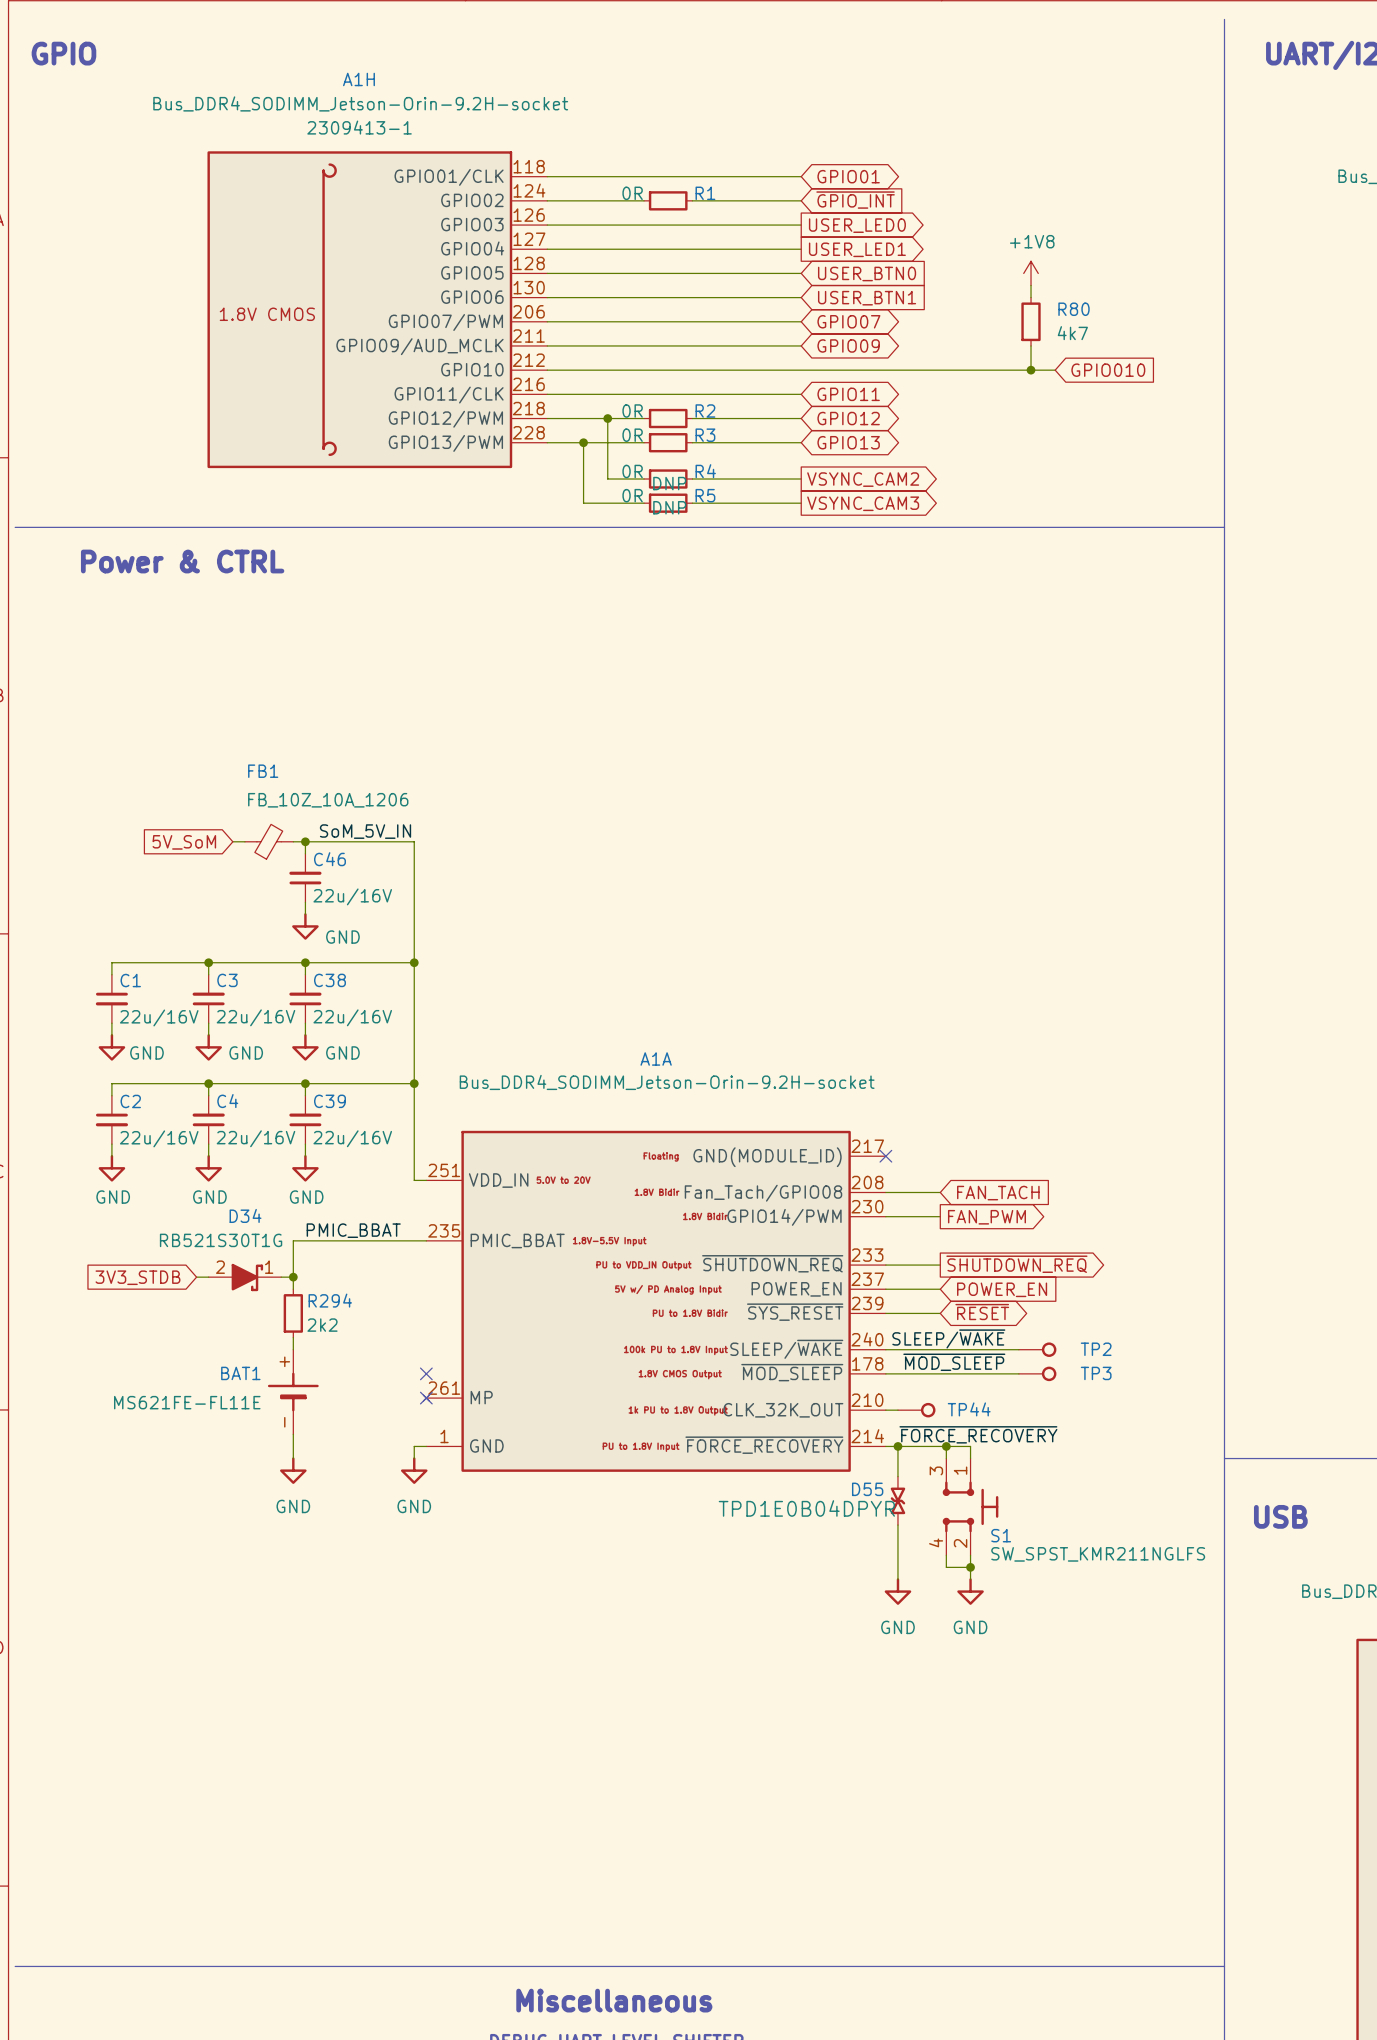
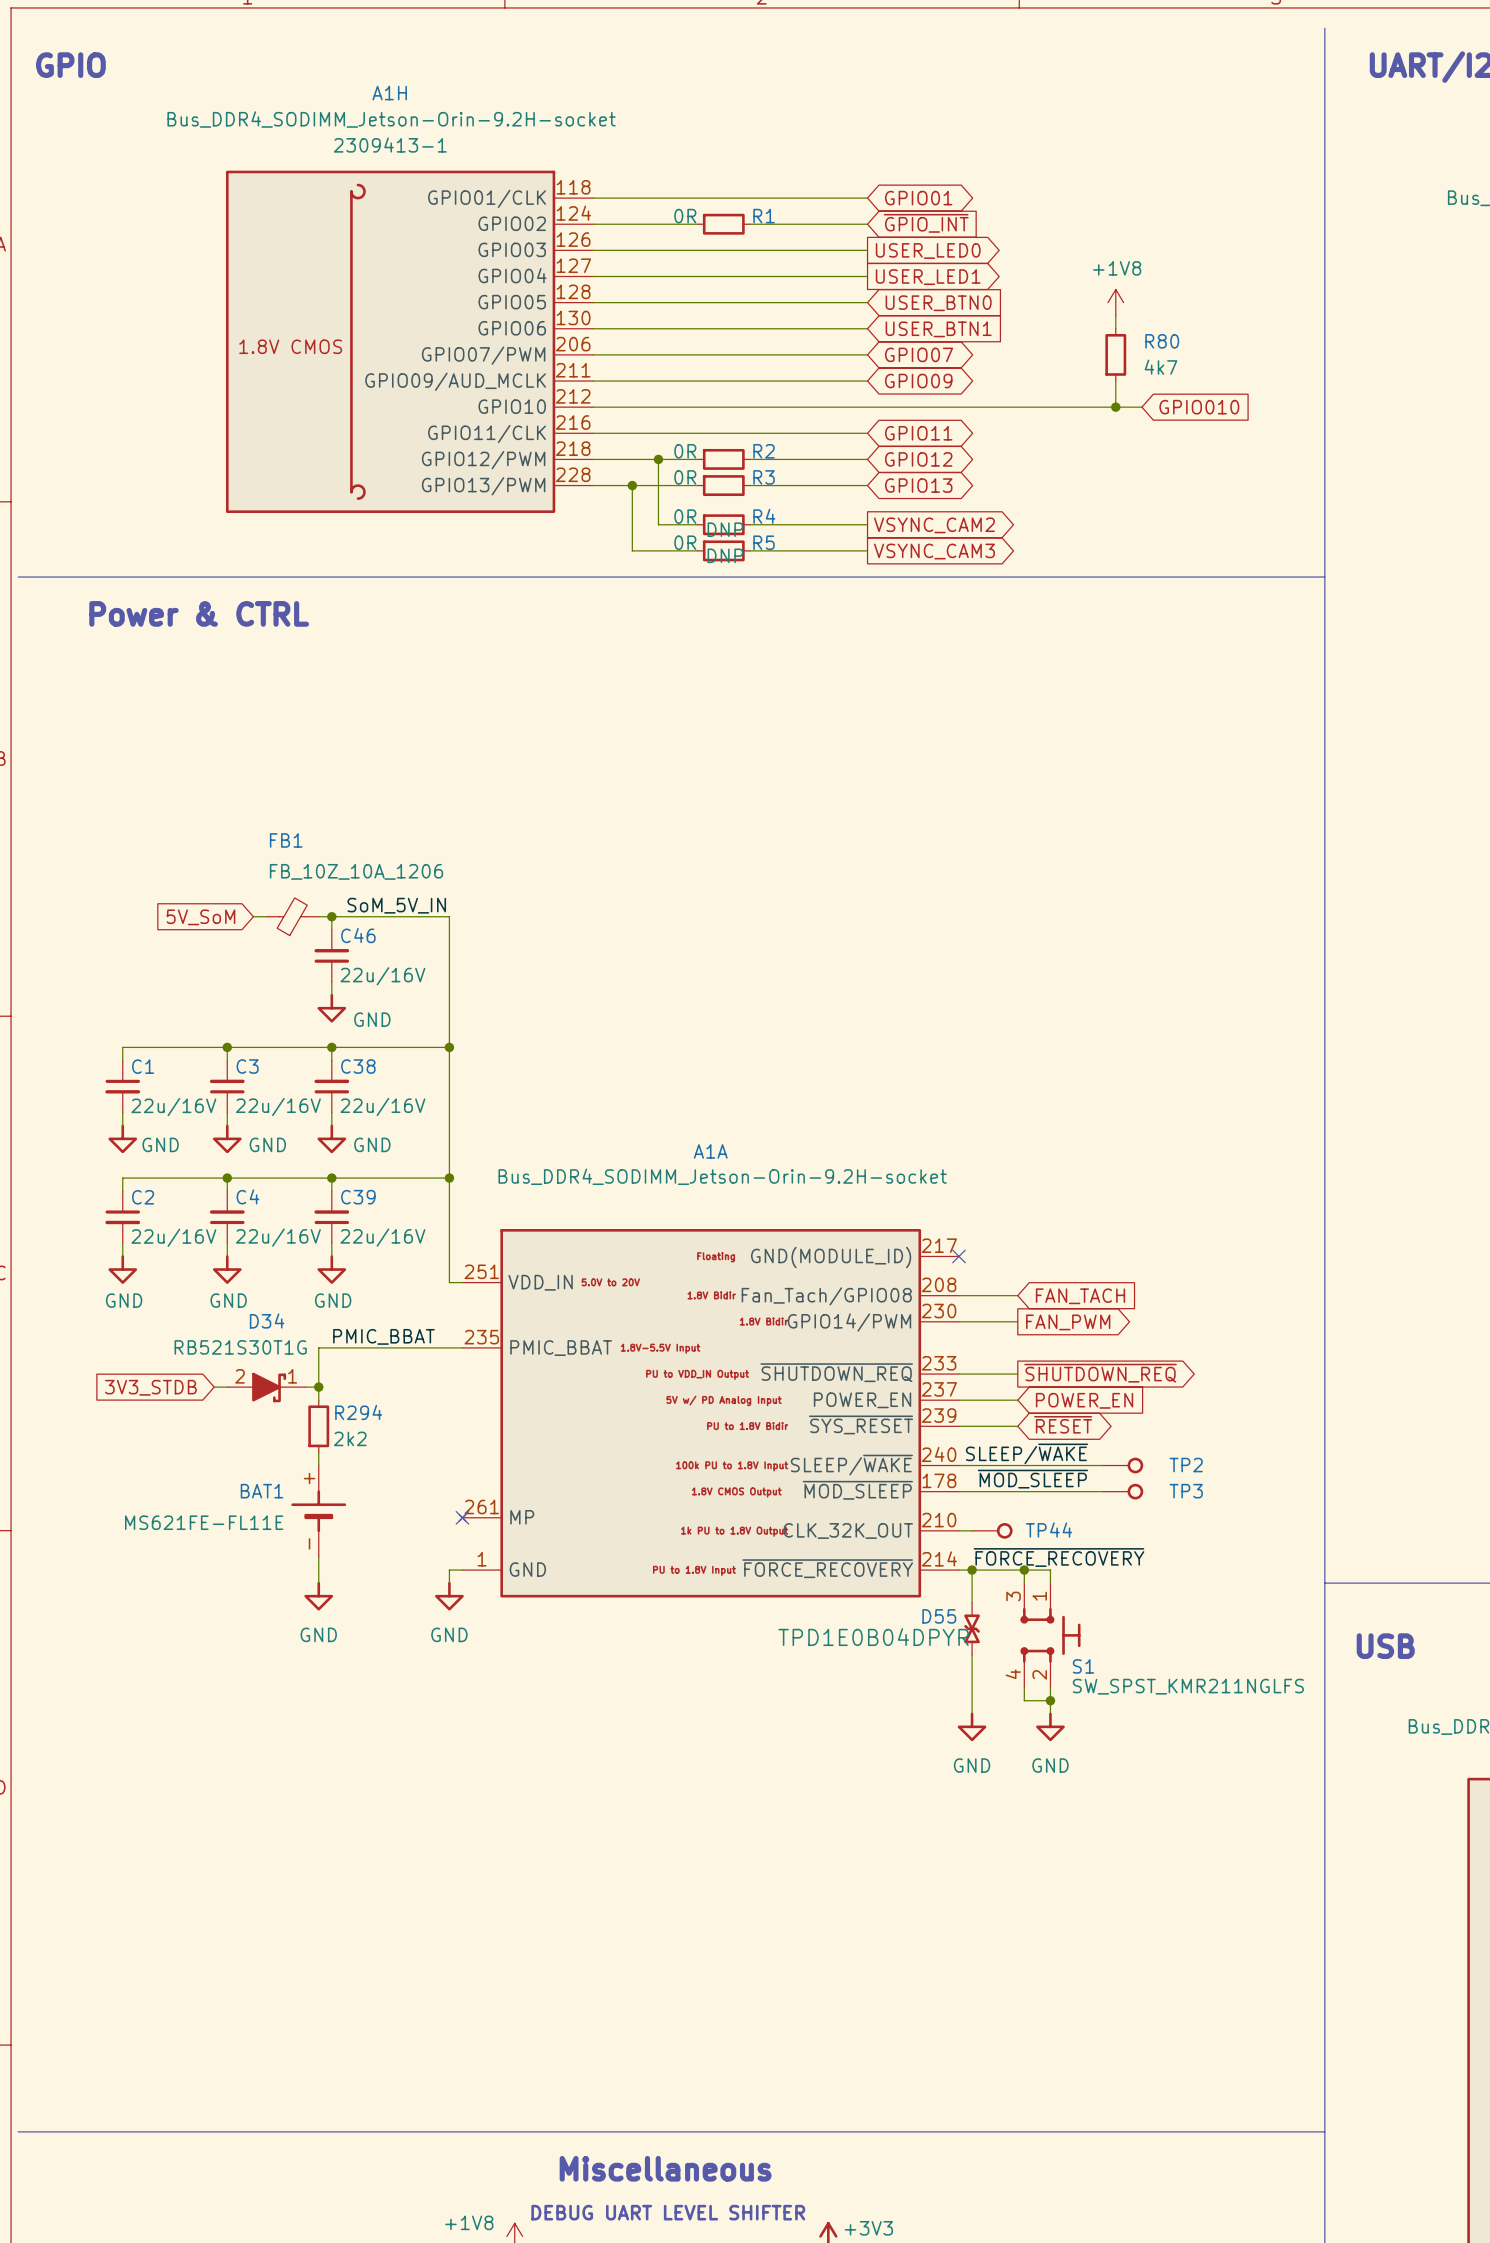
no-connect mark: (426, 1373) -> none

